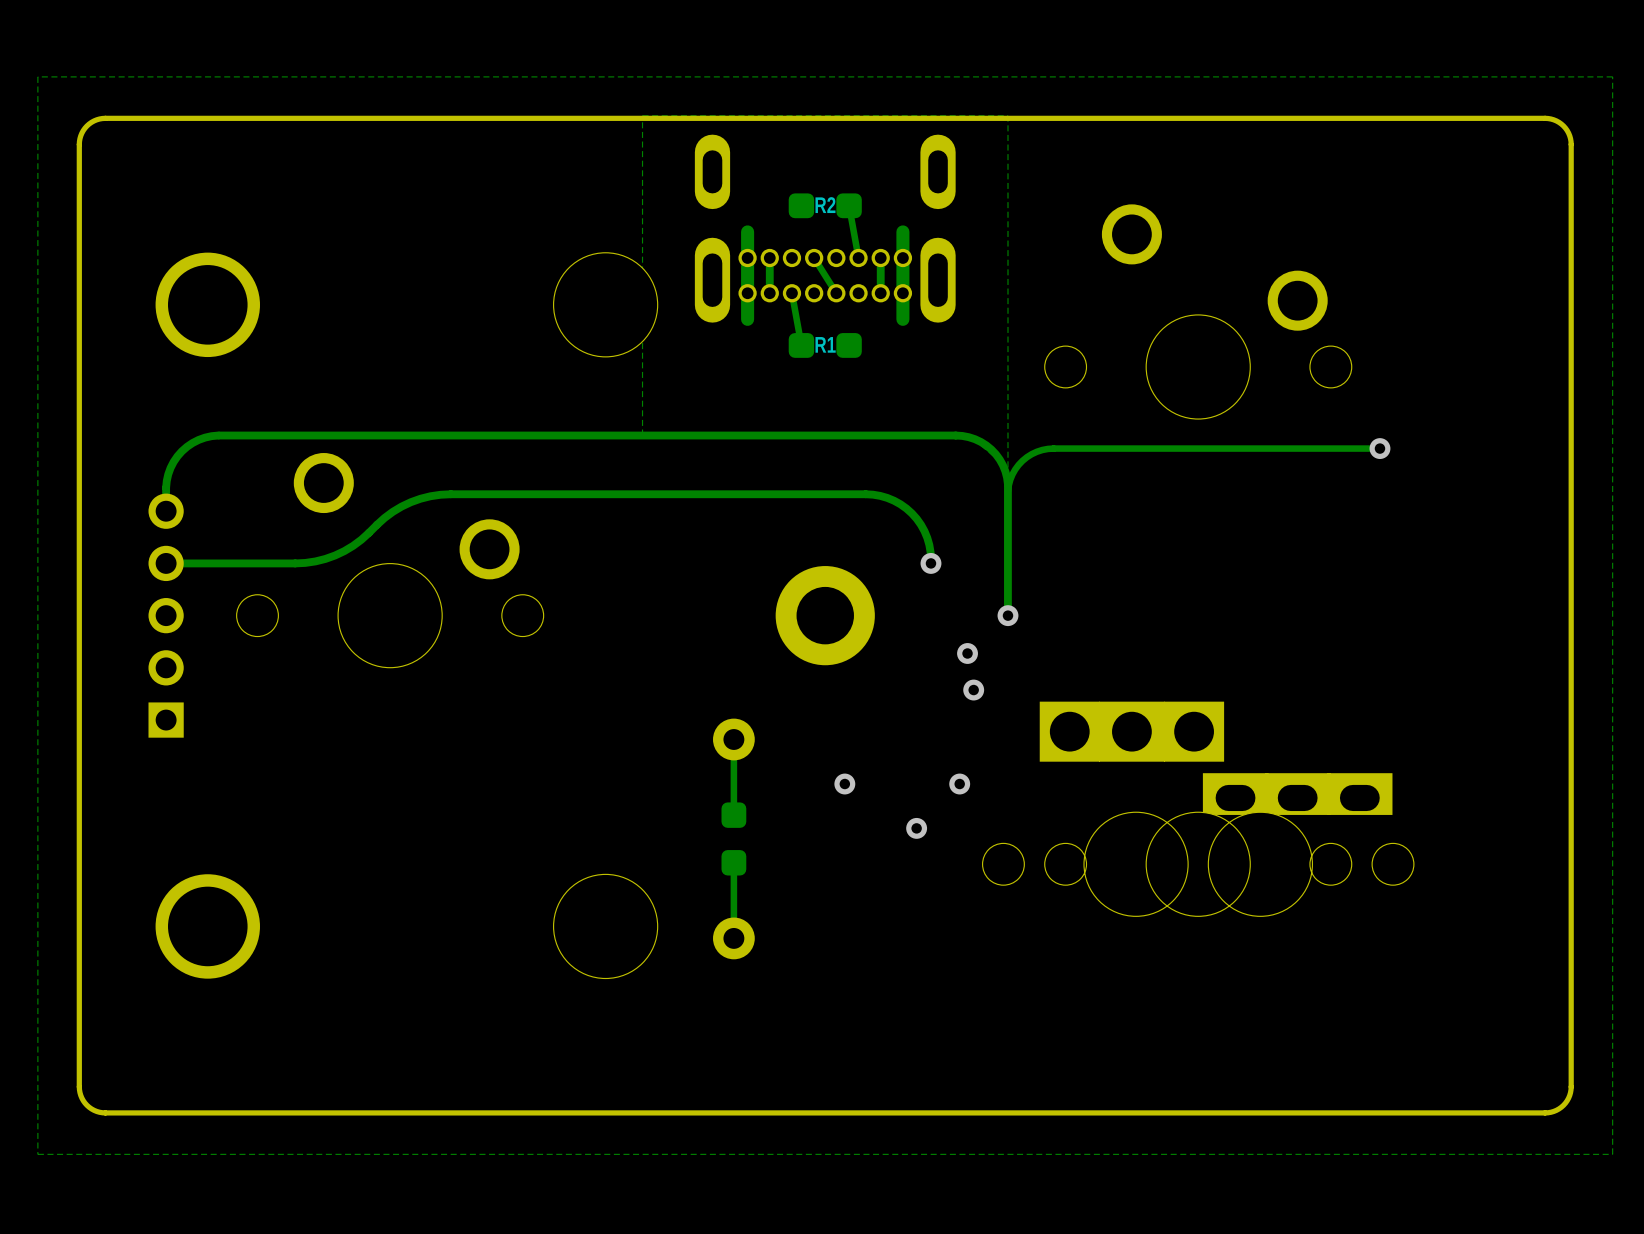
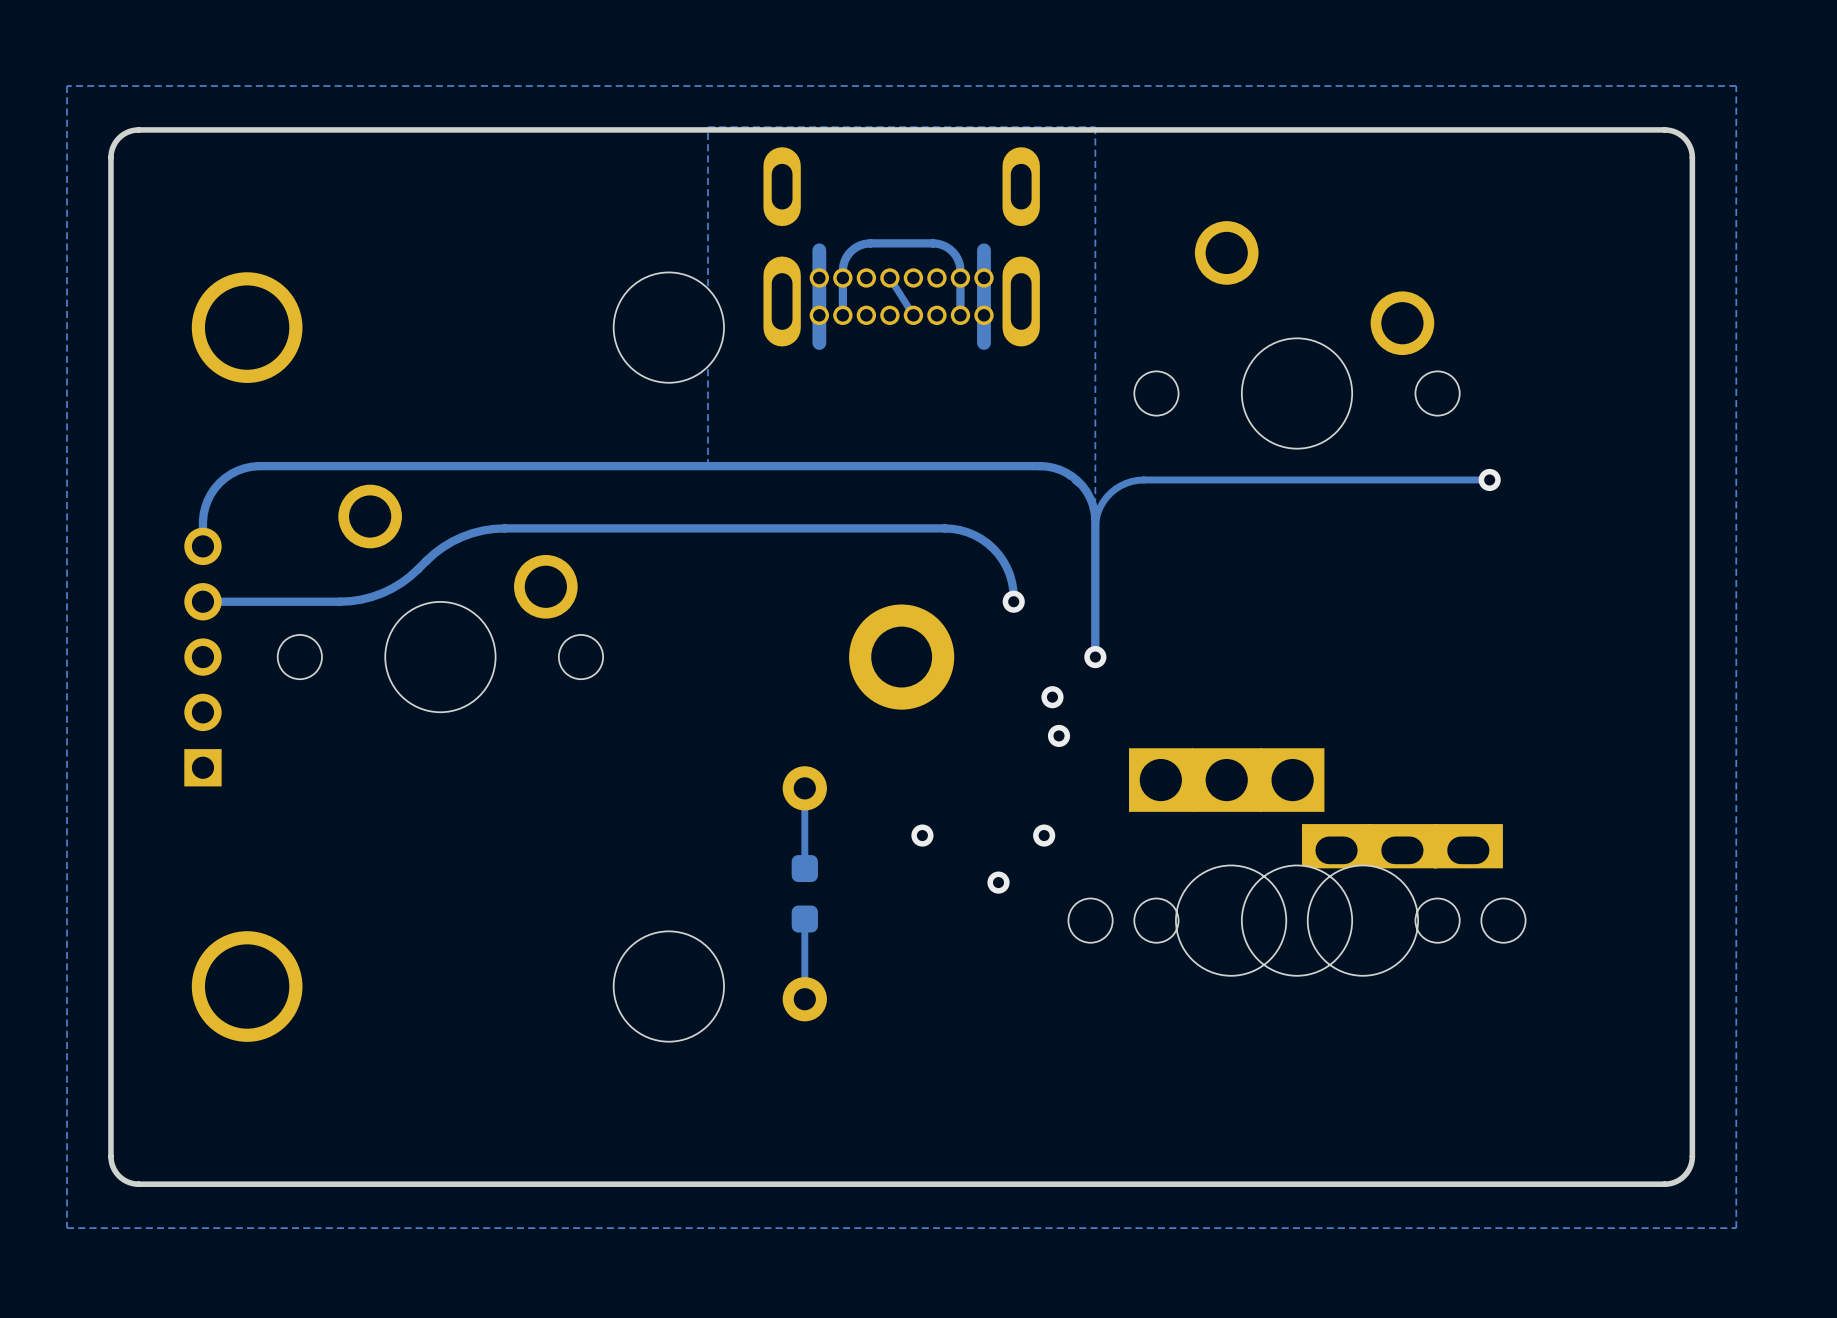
R2: (825, 205) -> none
track: (849, 205) (858, 258) -> none
track: none -> (960, 277) (959, 264) (954, 253) (944, 246) (932, 243) (861, 244) (853, 249) (847, 256) (843, 264) (842, 277)
track: (791, 293) (801, 345) -> none
R1: (825, 345) -> none

